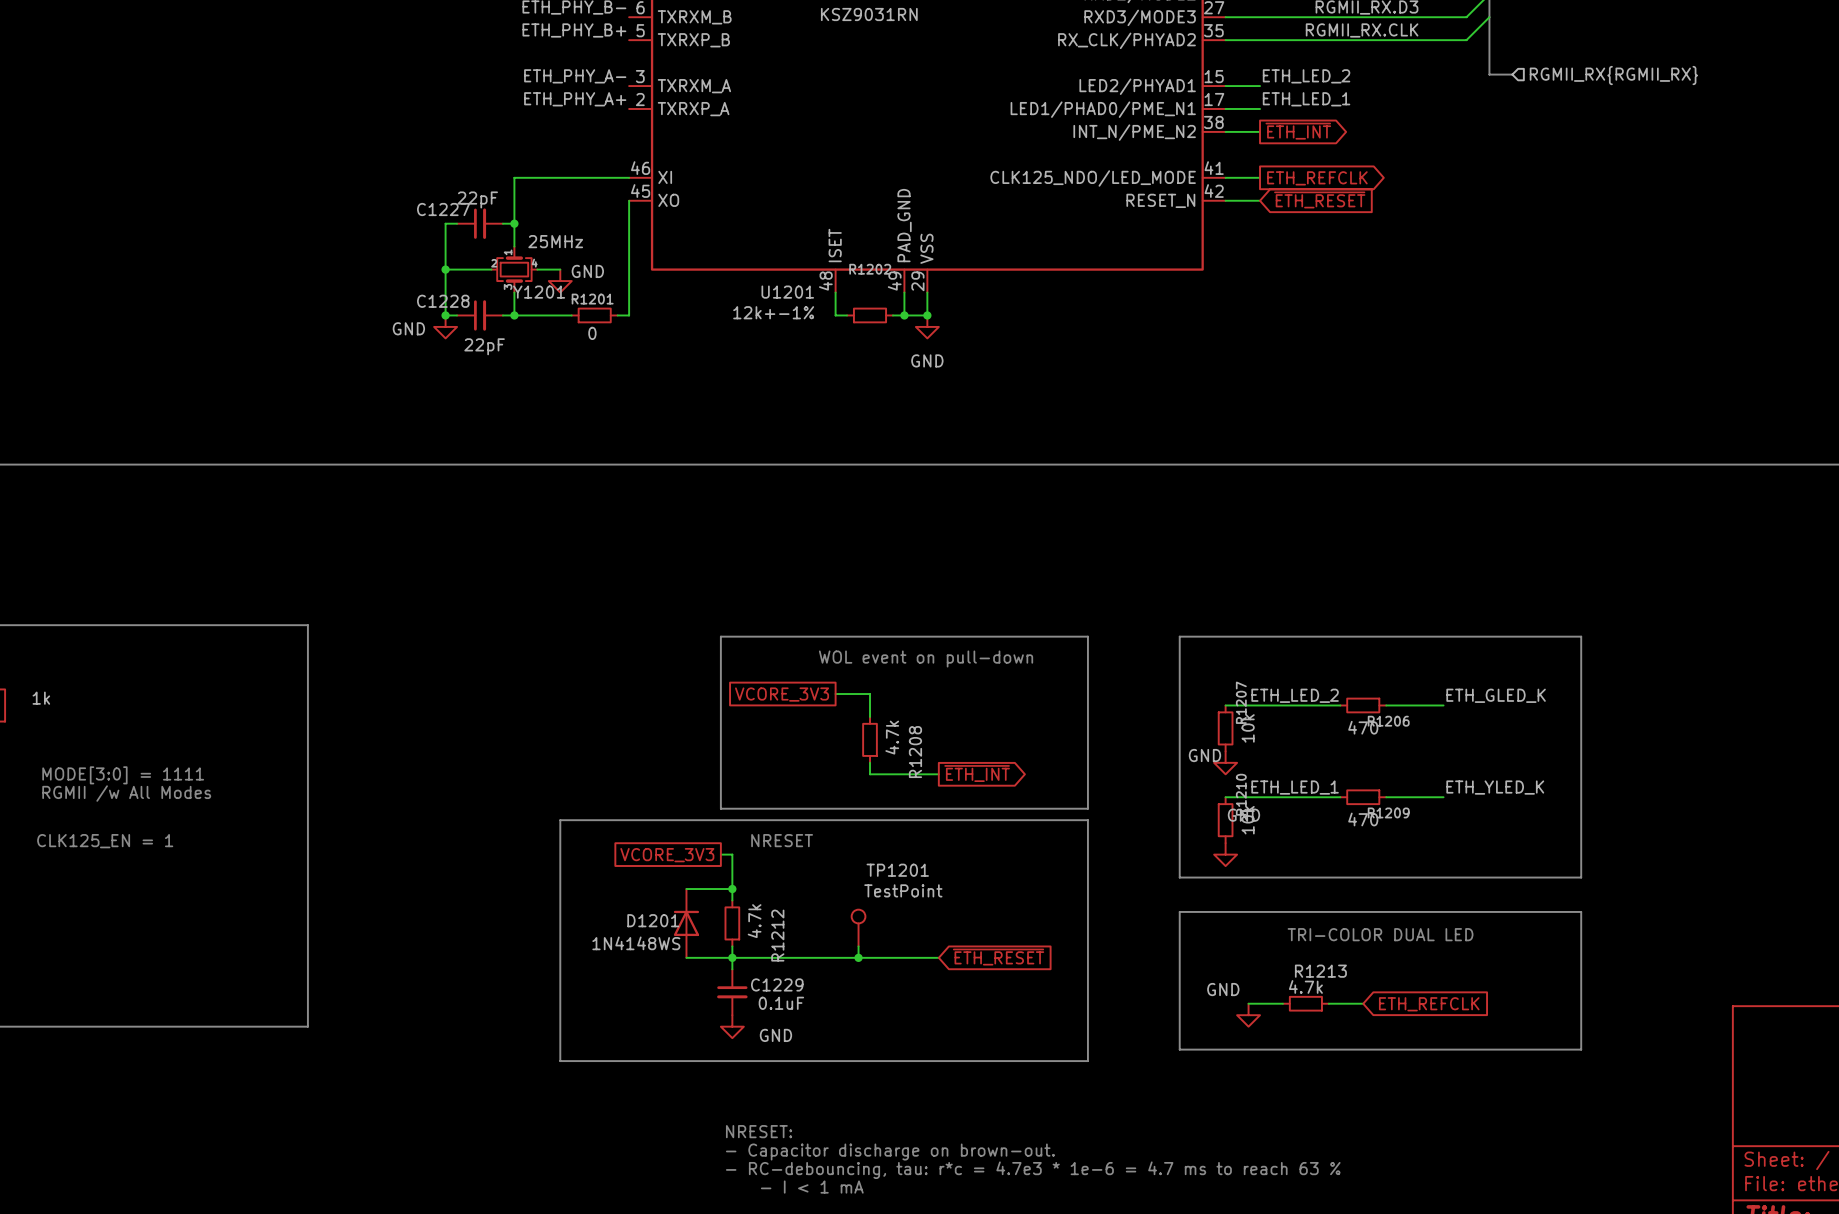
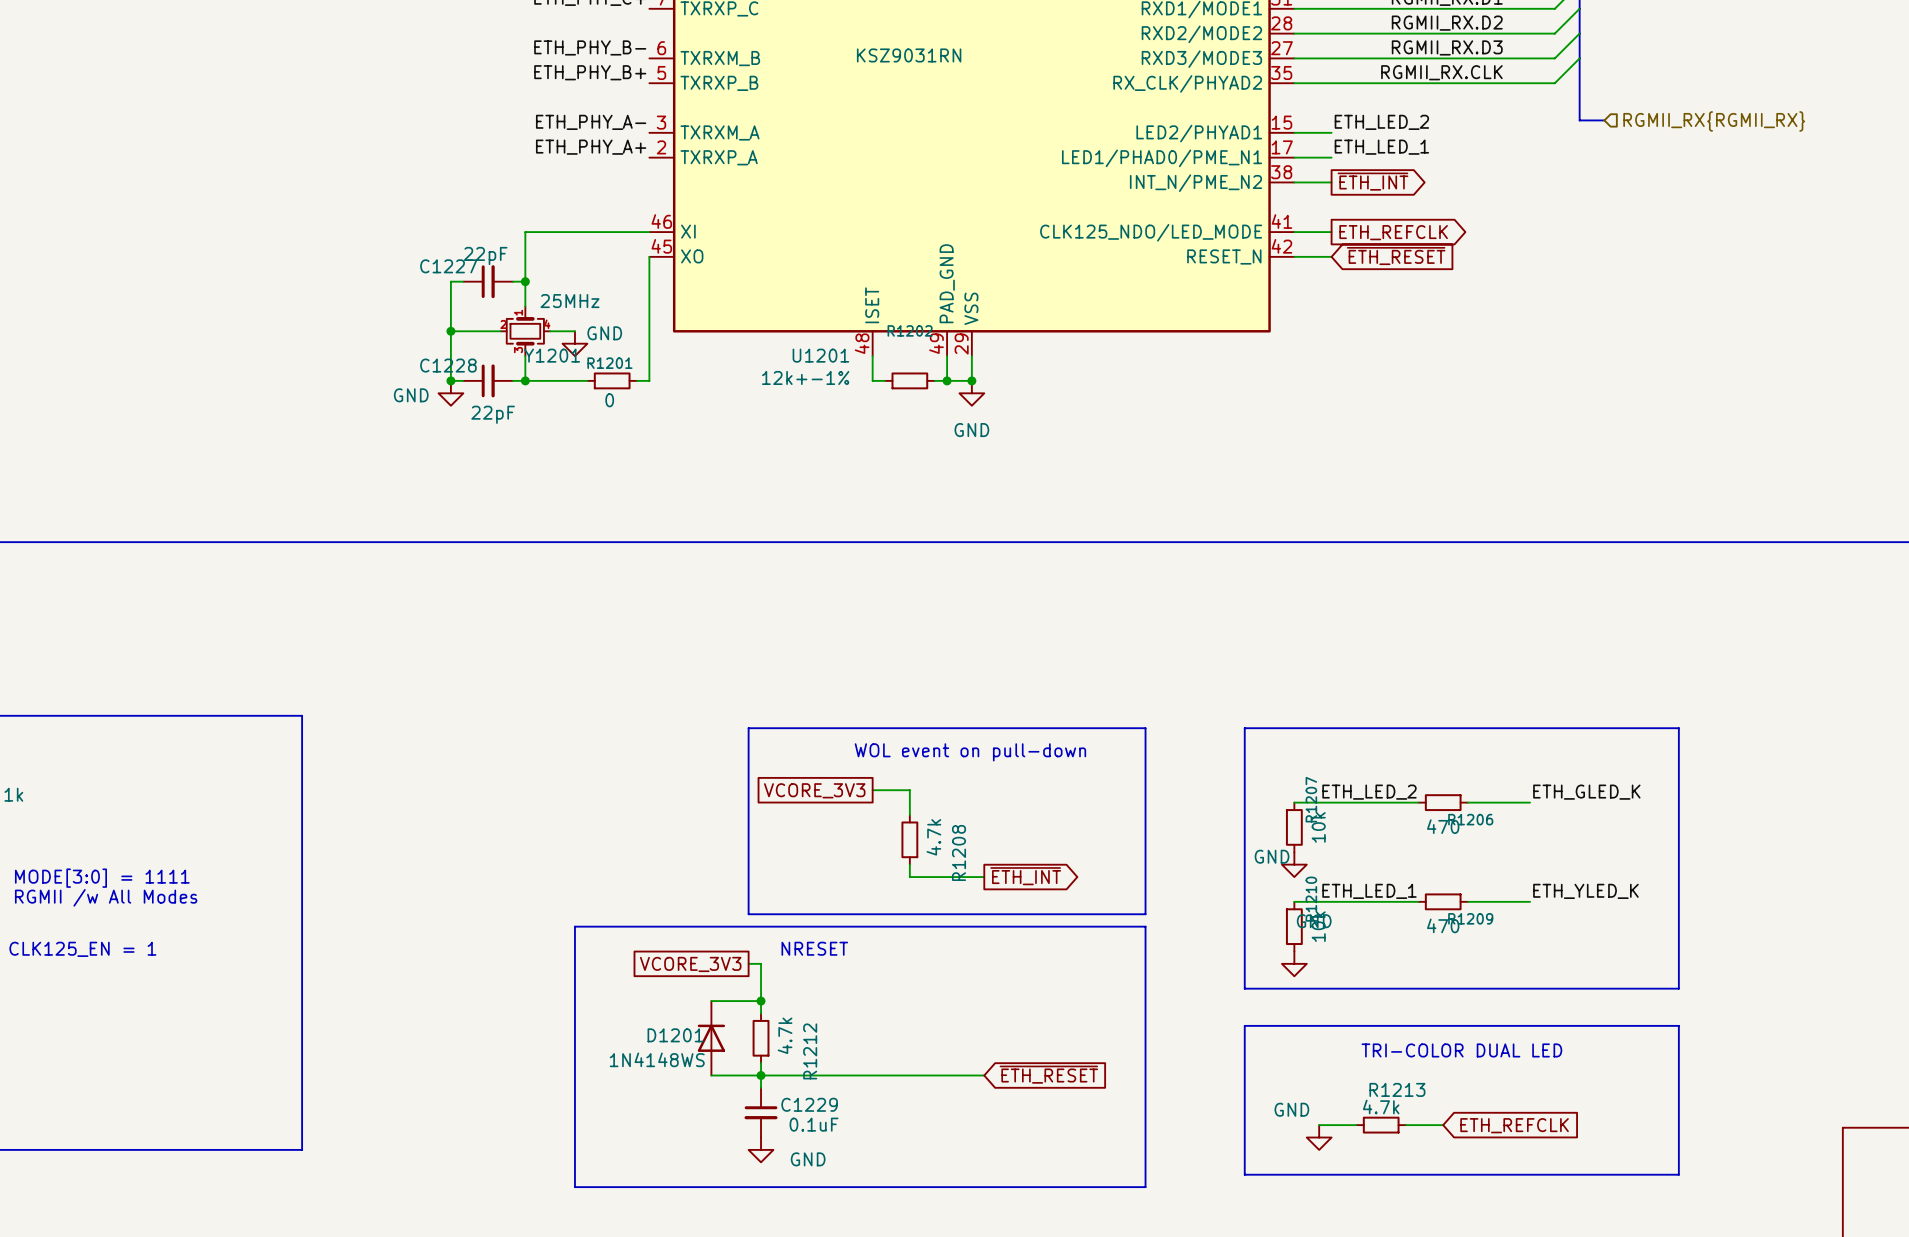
TP1201: TestPoint (858, 928) -> none
wire: (858, 946) (858, 957) -> none
junction: (858, 957) -> none

